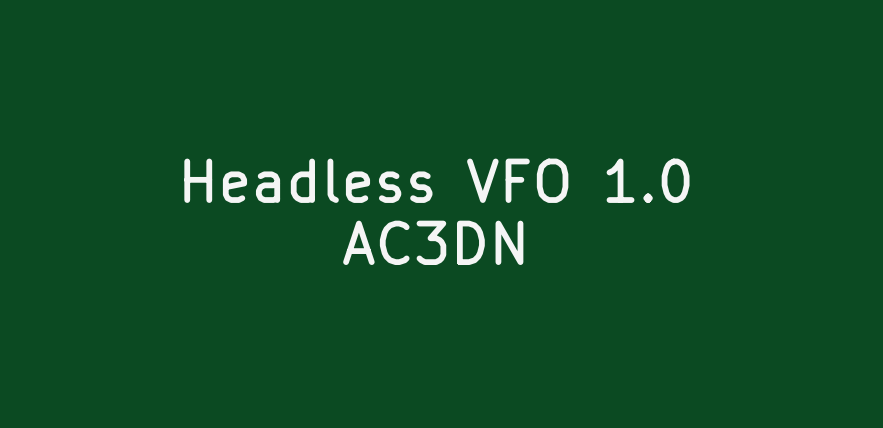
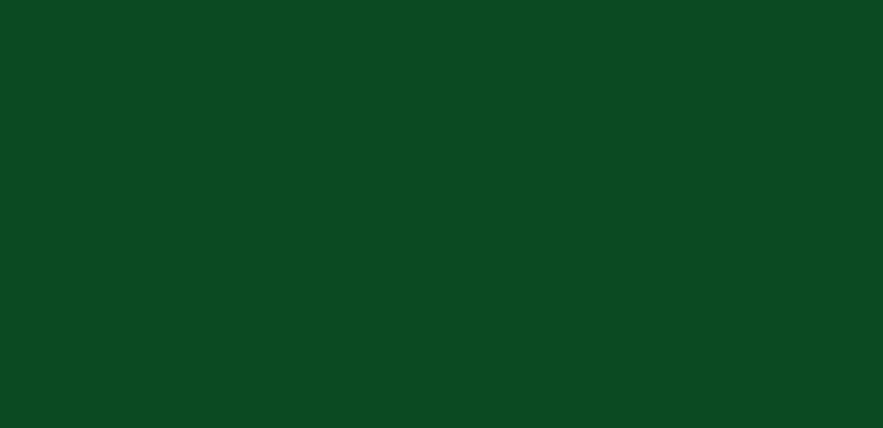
text: Headless VFO 1.0 (436, 180) -> none
text: AC3DN (433, 242) -> none

